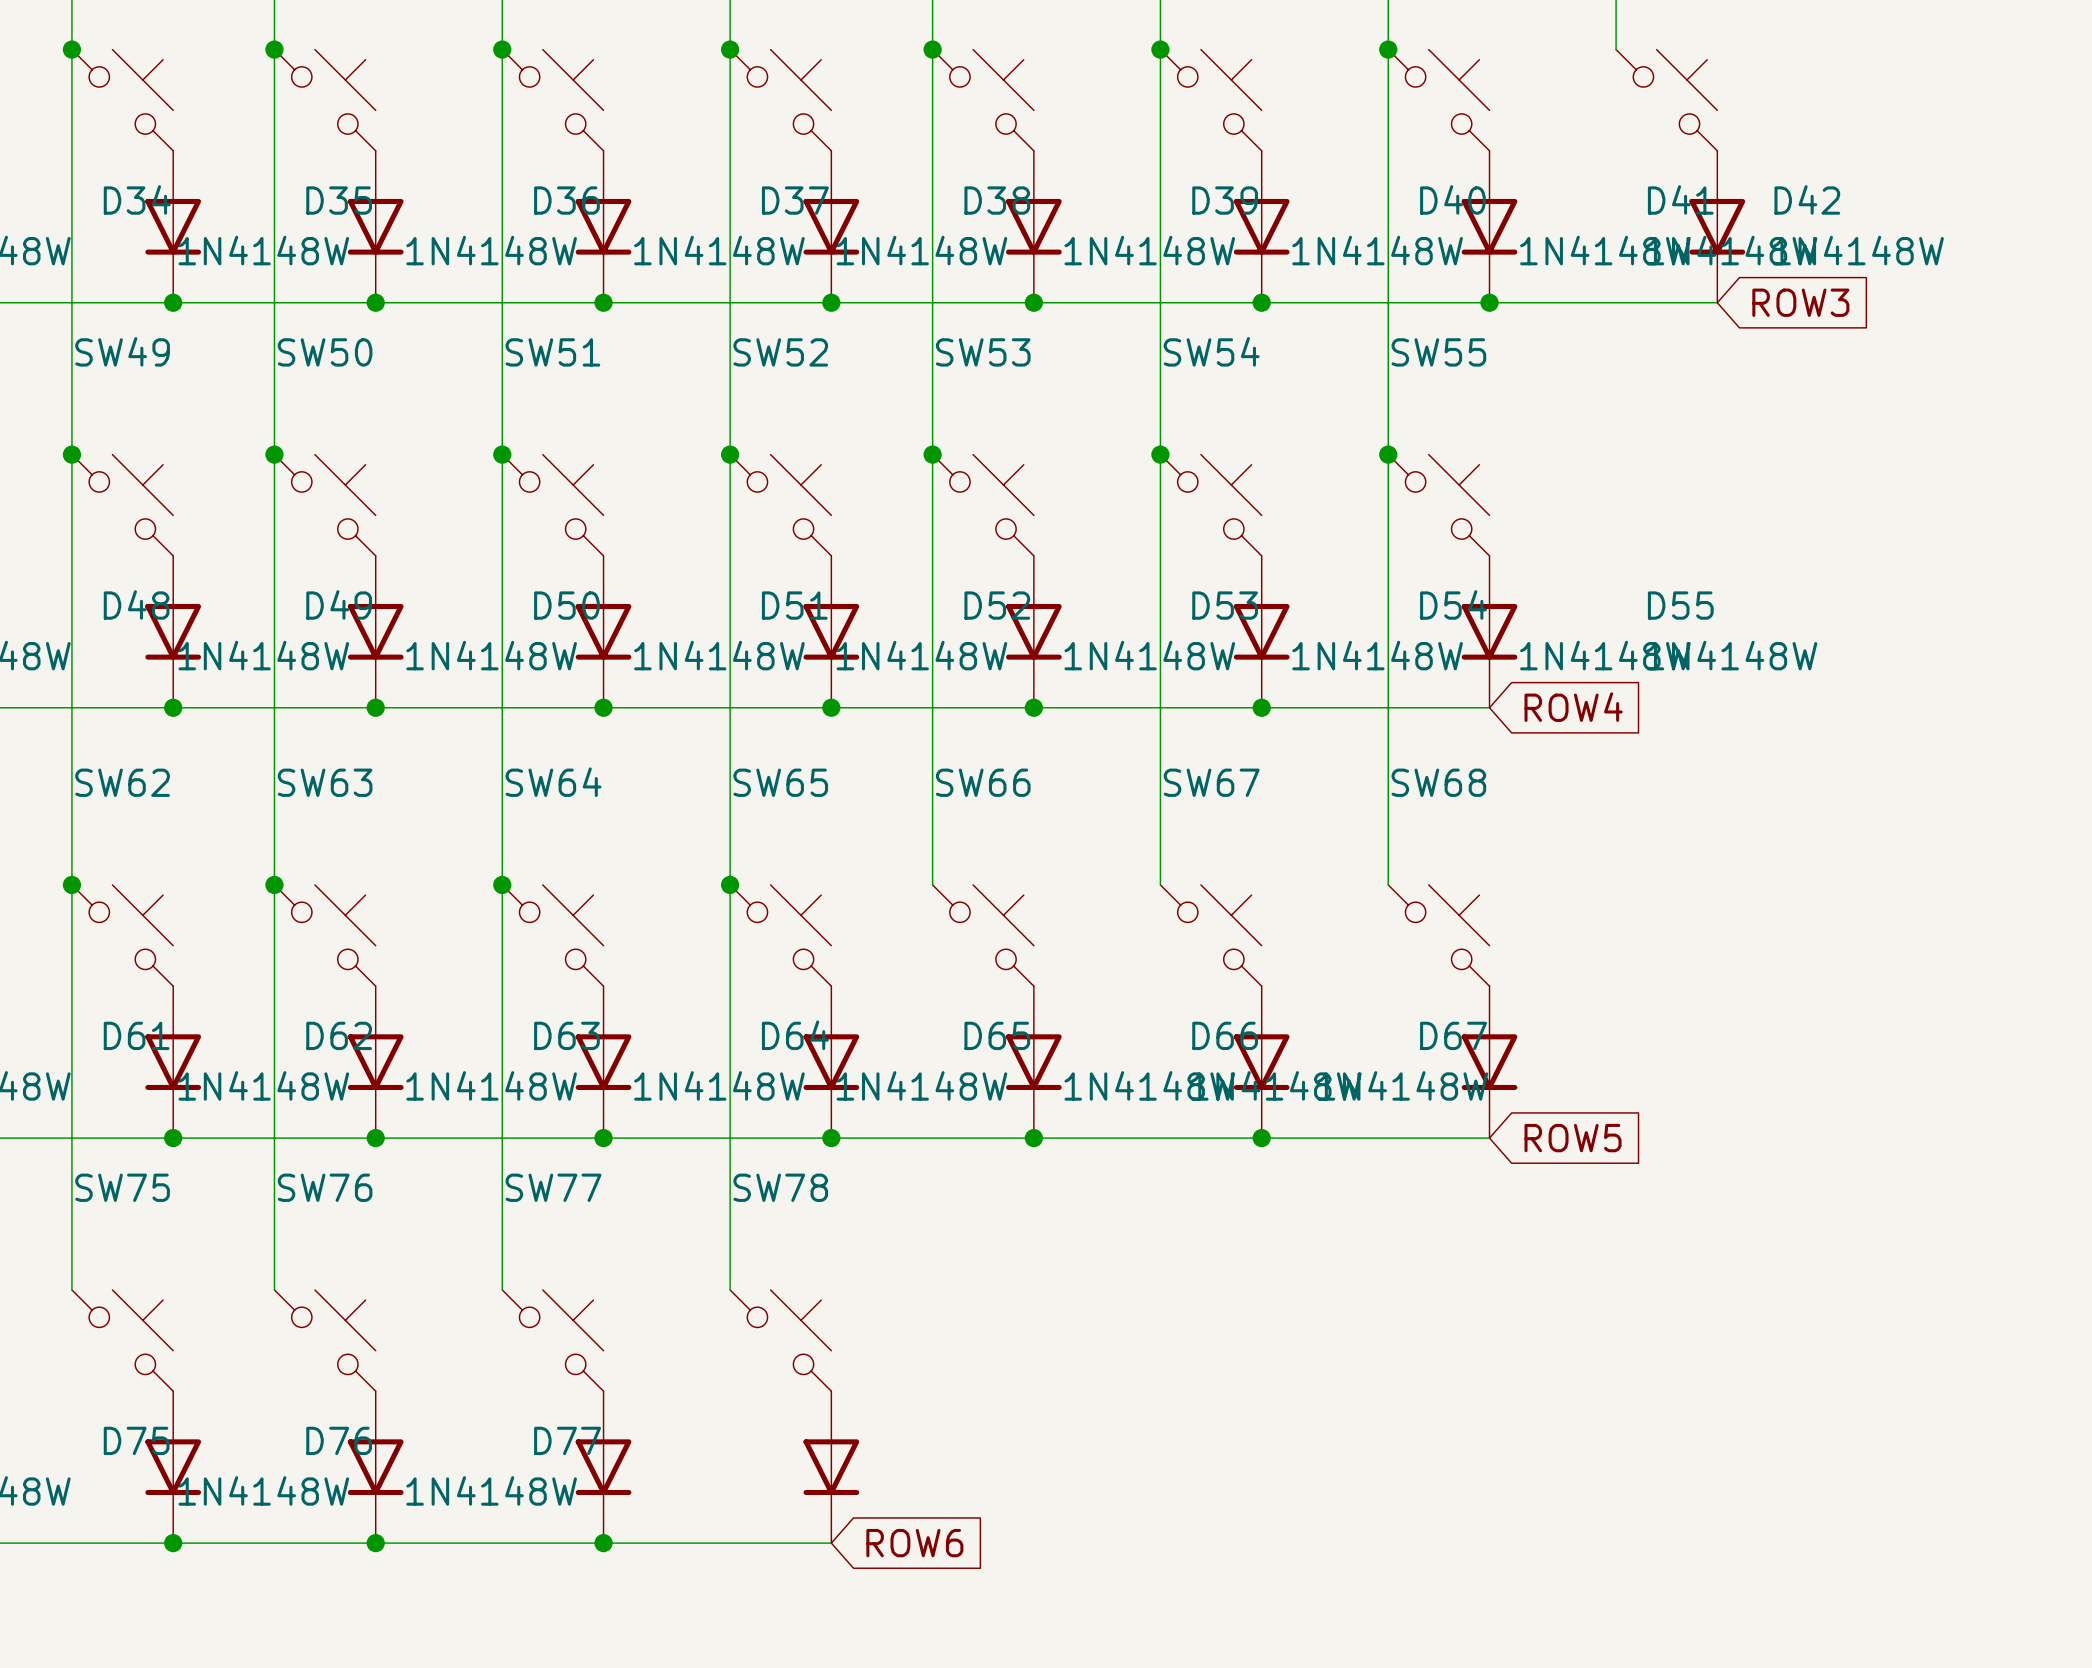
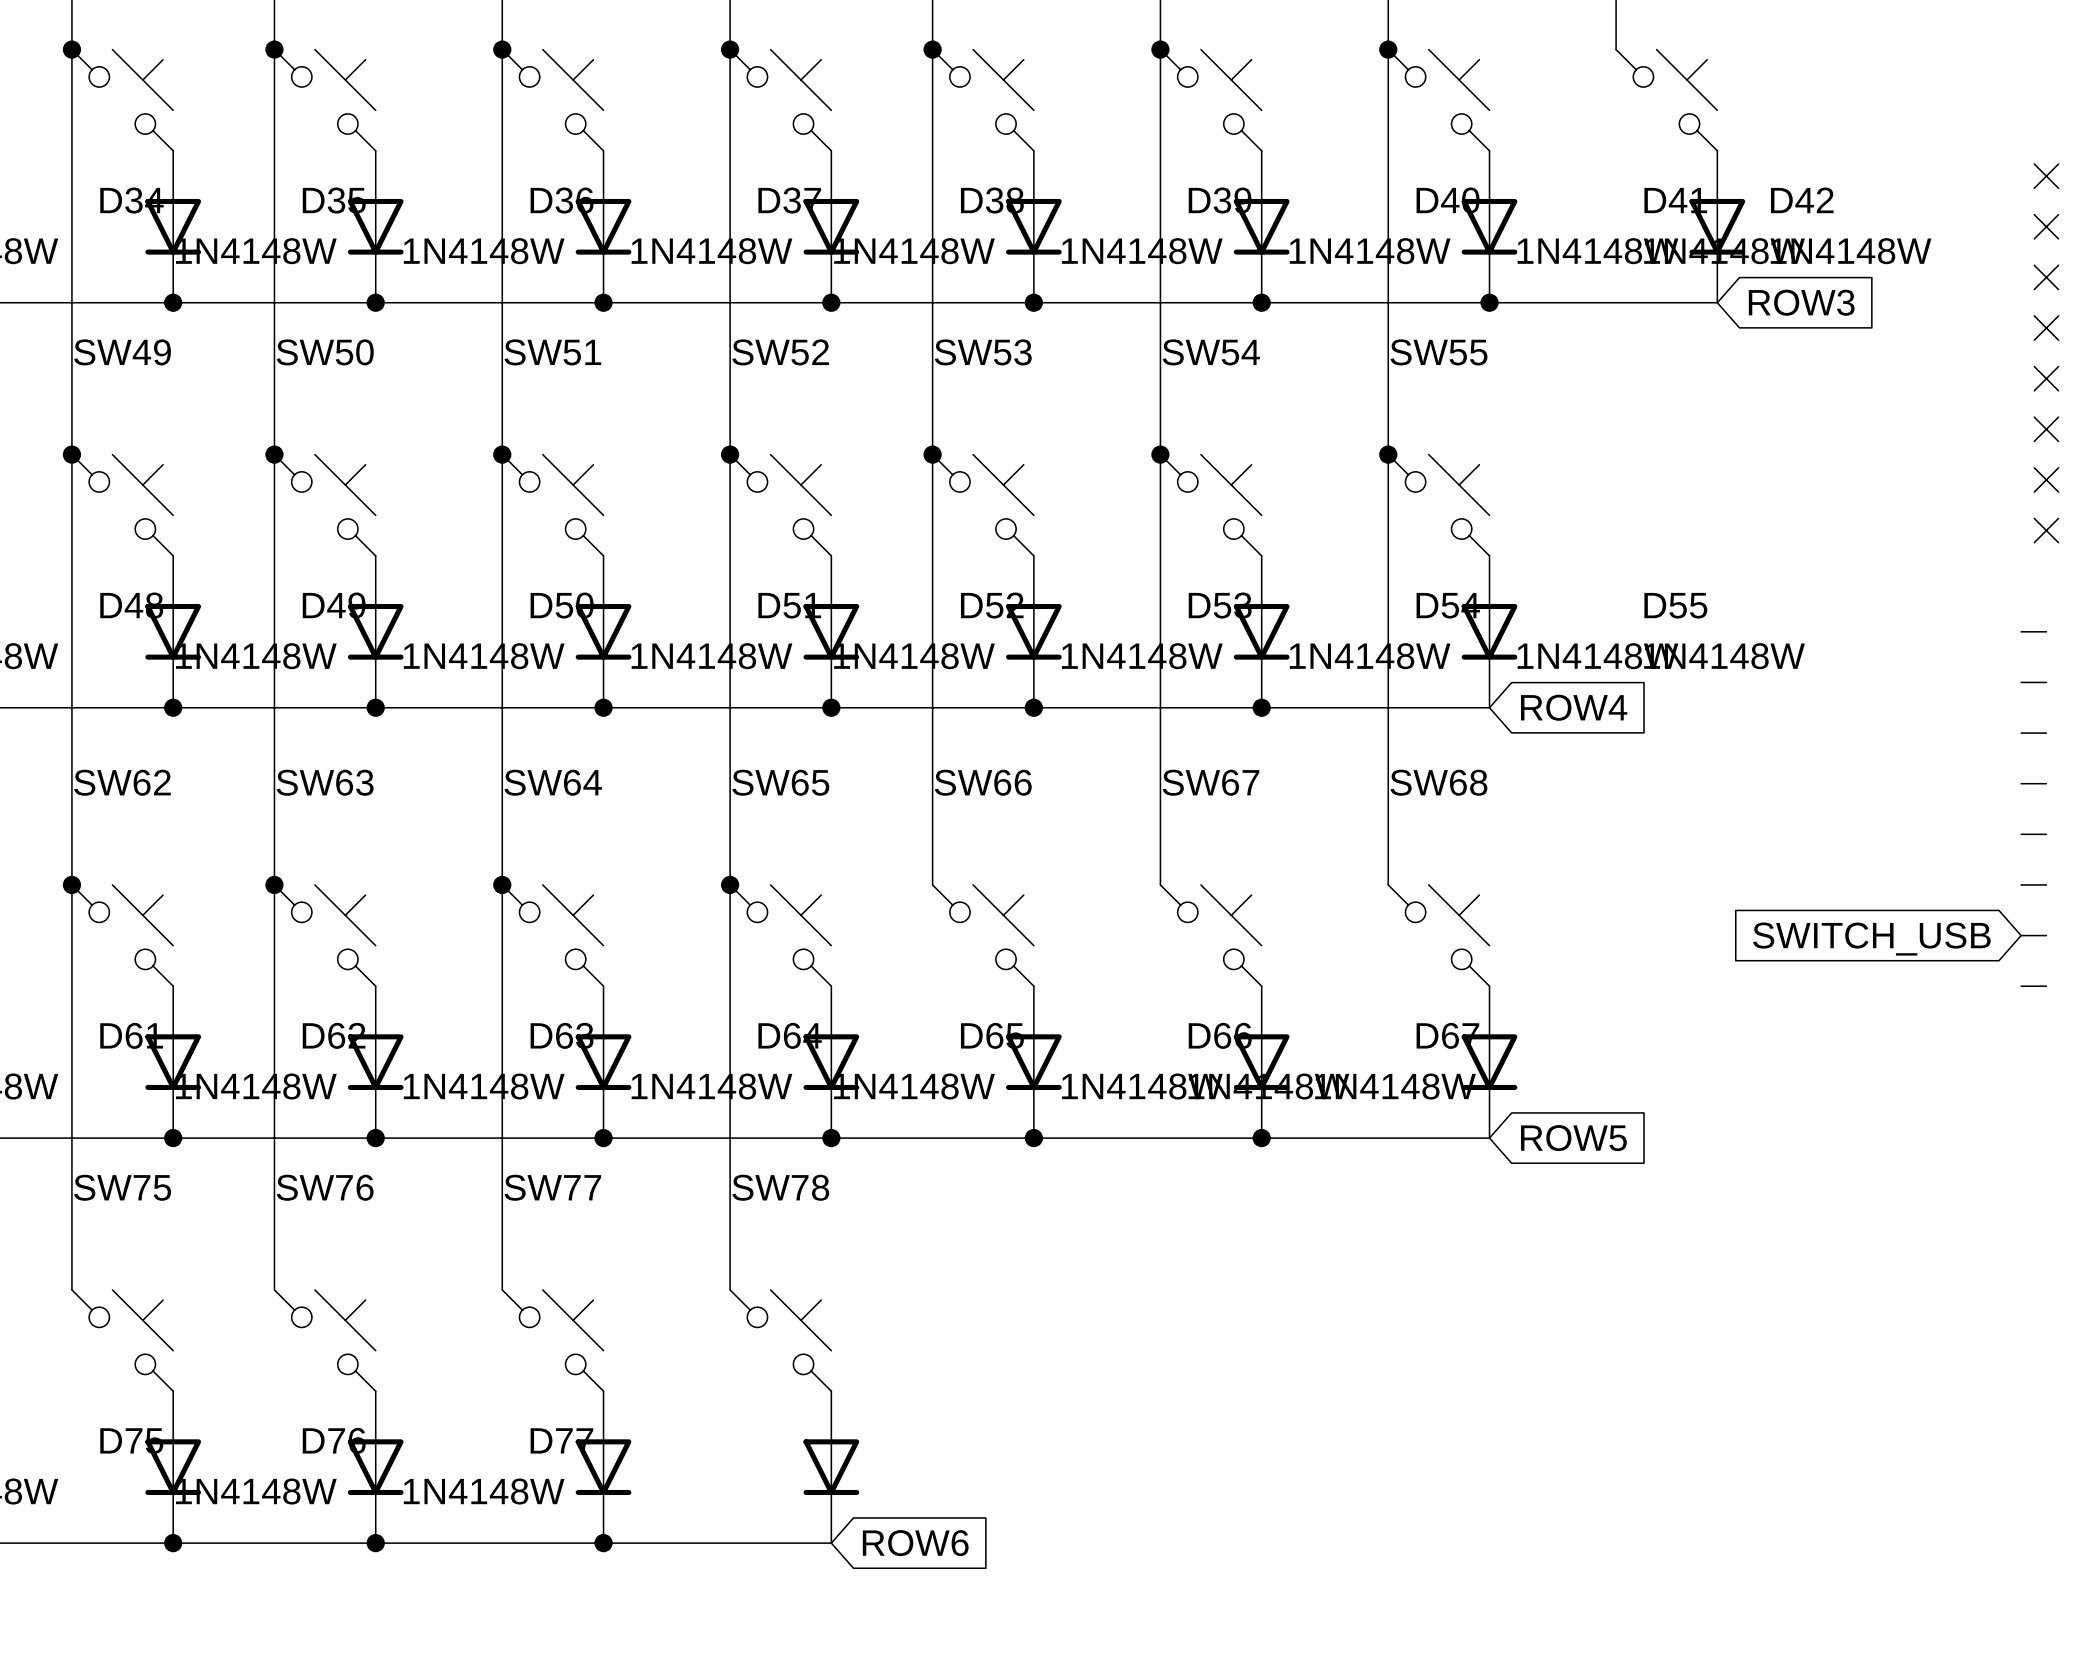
no-connect mark: none -> (2046, 176)
no-connect mark: none -> (2046, 226)
no-connect mark: none -> (2046, 277)
no-connect mark: none -> (2046, 328)
no-connect mark: none -> (2046, 378)
no-connect mark: none -> (2046, 429)
no-connect mark: none -> (2046, 479)
no-connect mark: none -> (2046, 530)
wire: none -> (2021, 631) (2046, 631)
wire: none -> (2021, 682) (2046, 682)
wire: none -> (2021, 733) (2046, 733)
wire: none -> (2021, 783) (2046, 783)
wire: none -> (2021, 834) (2046, 834)
wire: none -> (2021, 884) (2046, 884)
wire: none -> (2021, 935) (2046, 935)
global label: none -> SWITCH_USB (1871, 939)
wire: none -> (2021, 986) (2046, 986)

